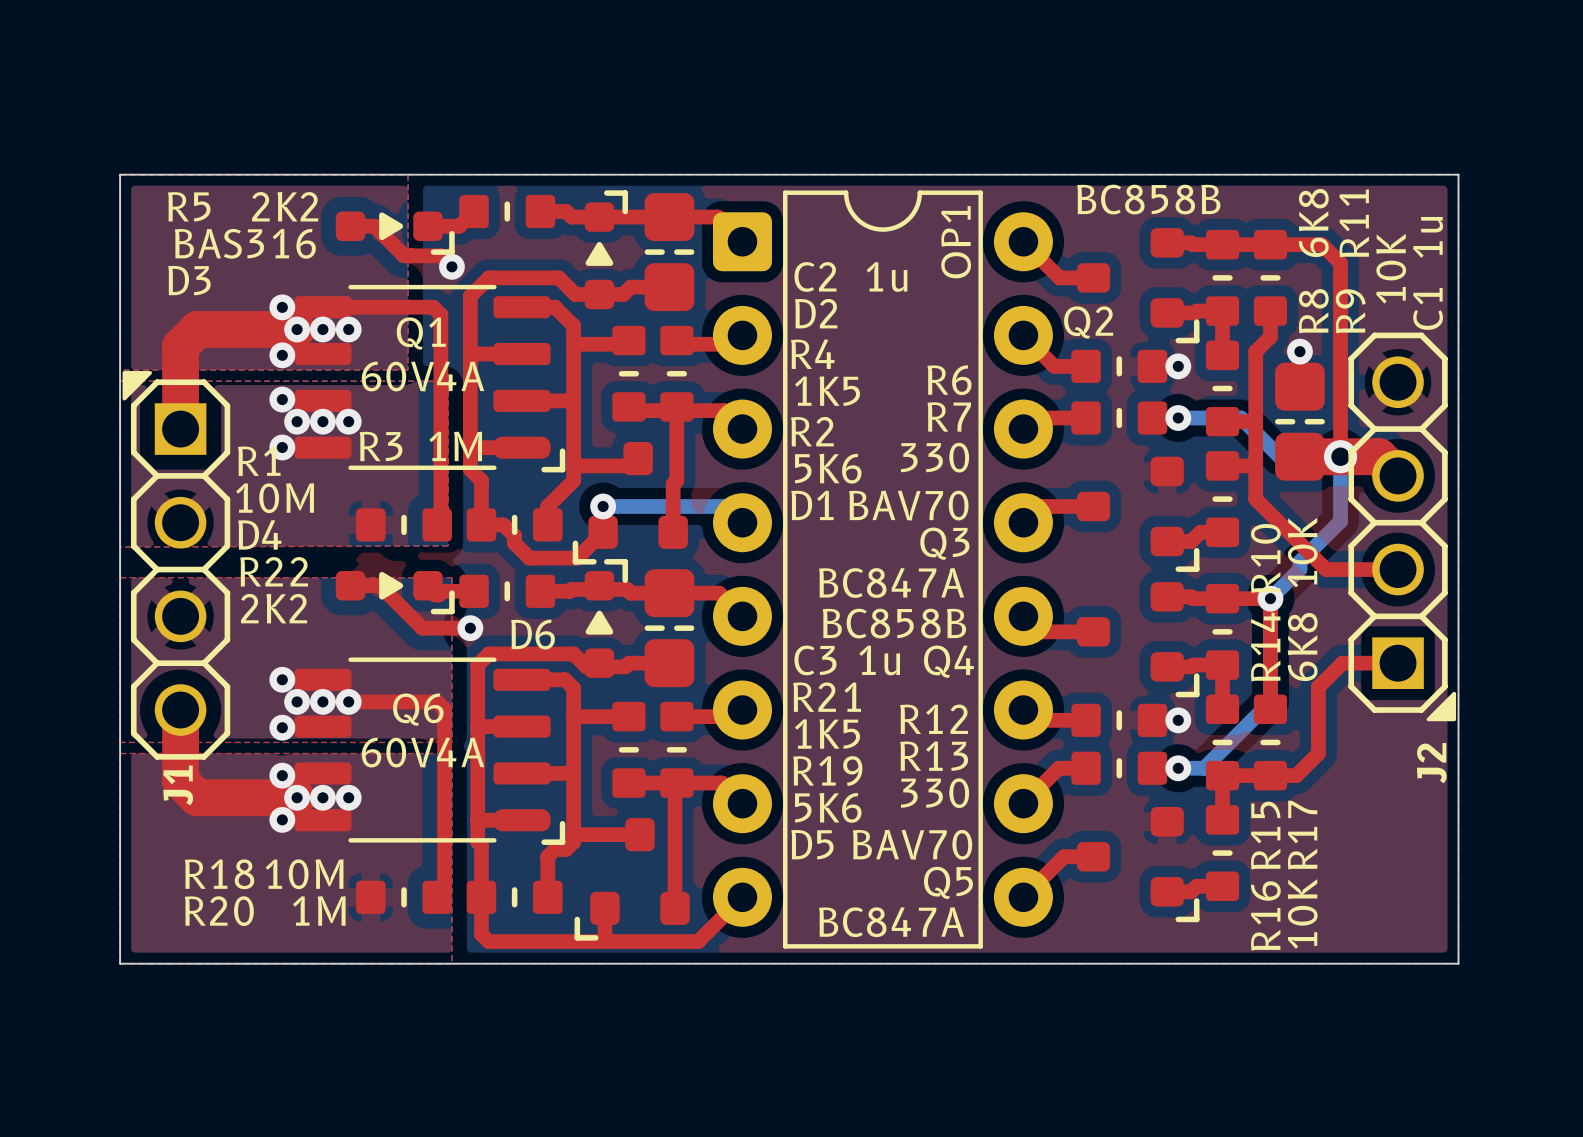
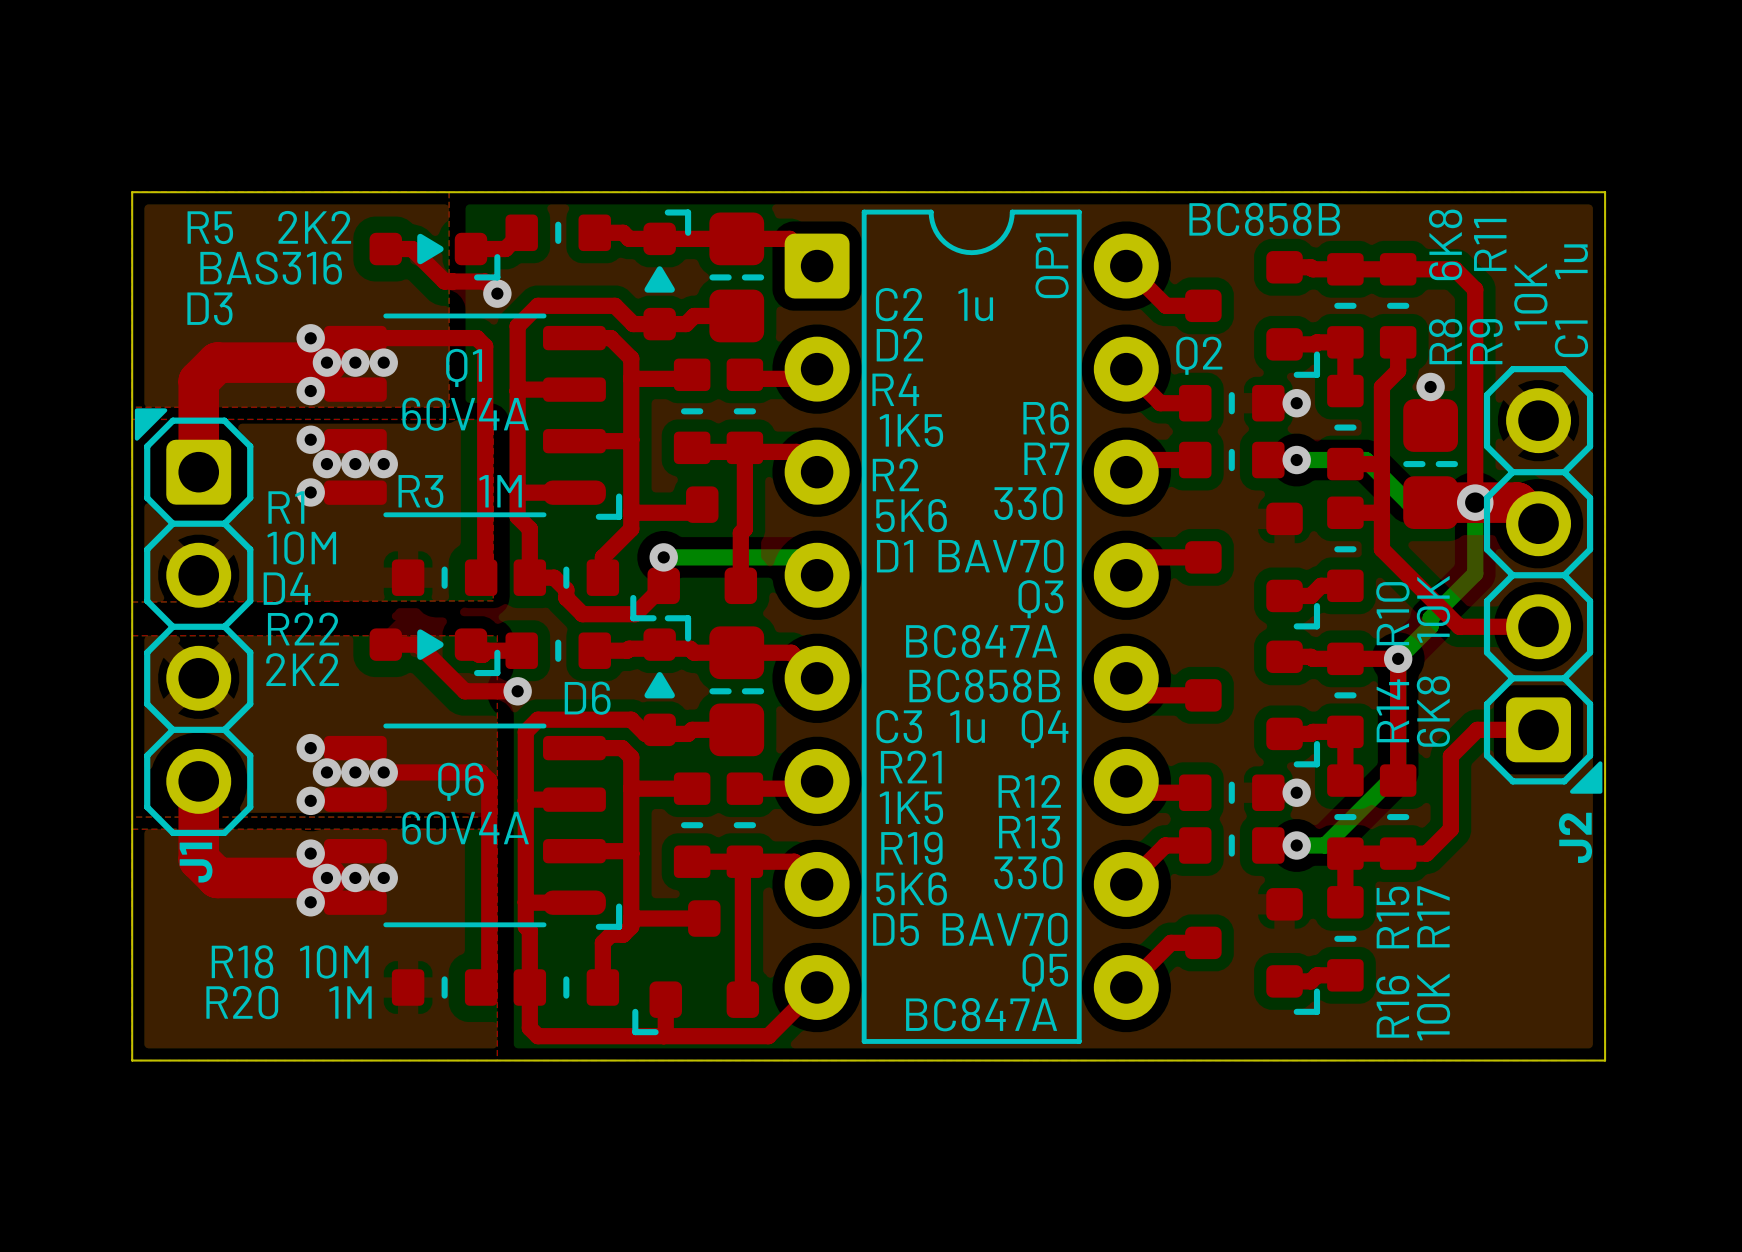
J2 footprint: [1348, 332, 1457, 722] -> [1483, 366, 1603, 794]
J1 footprint: [122, 371, 231, 760] -> [134, 408, 254, 837]

